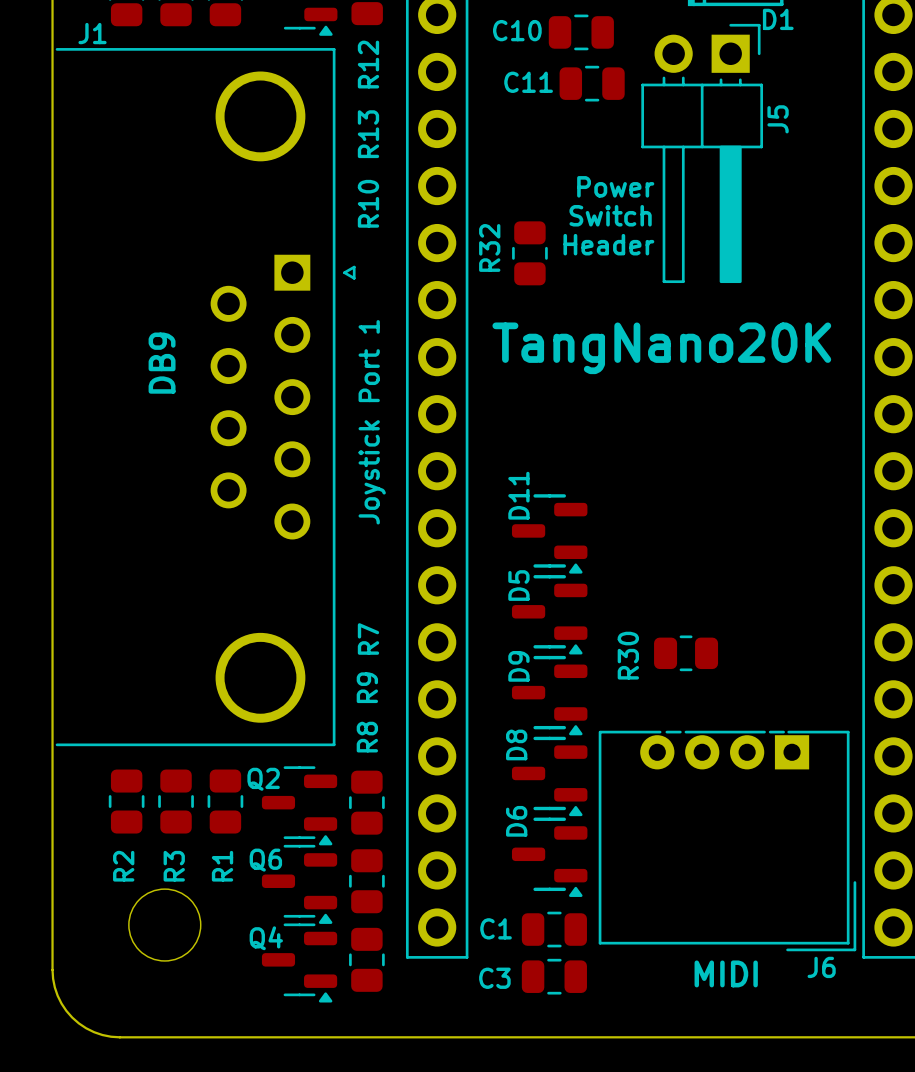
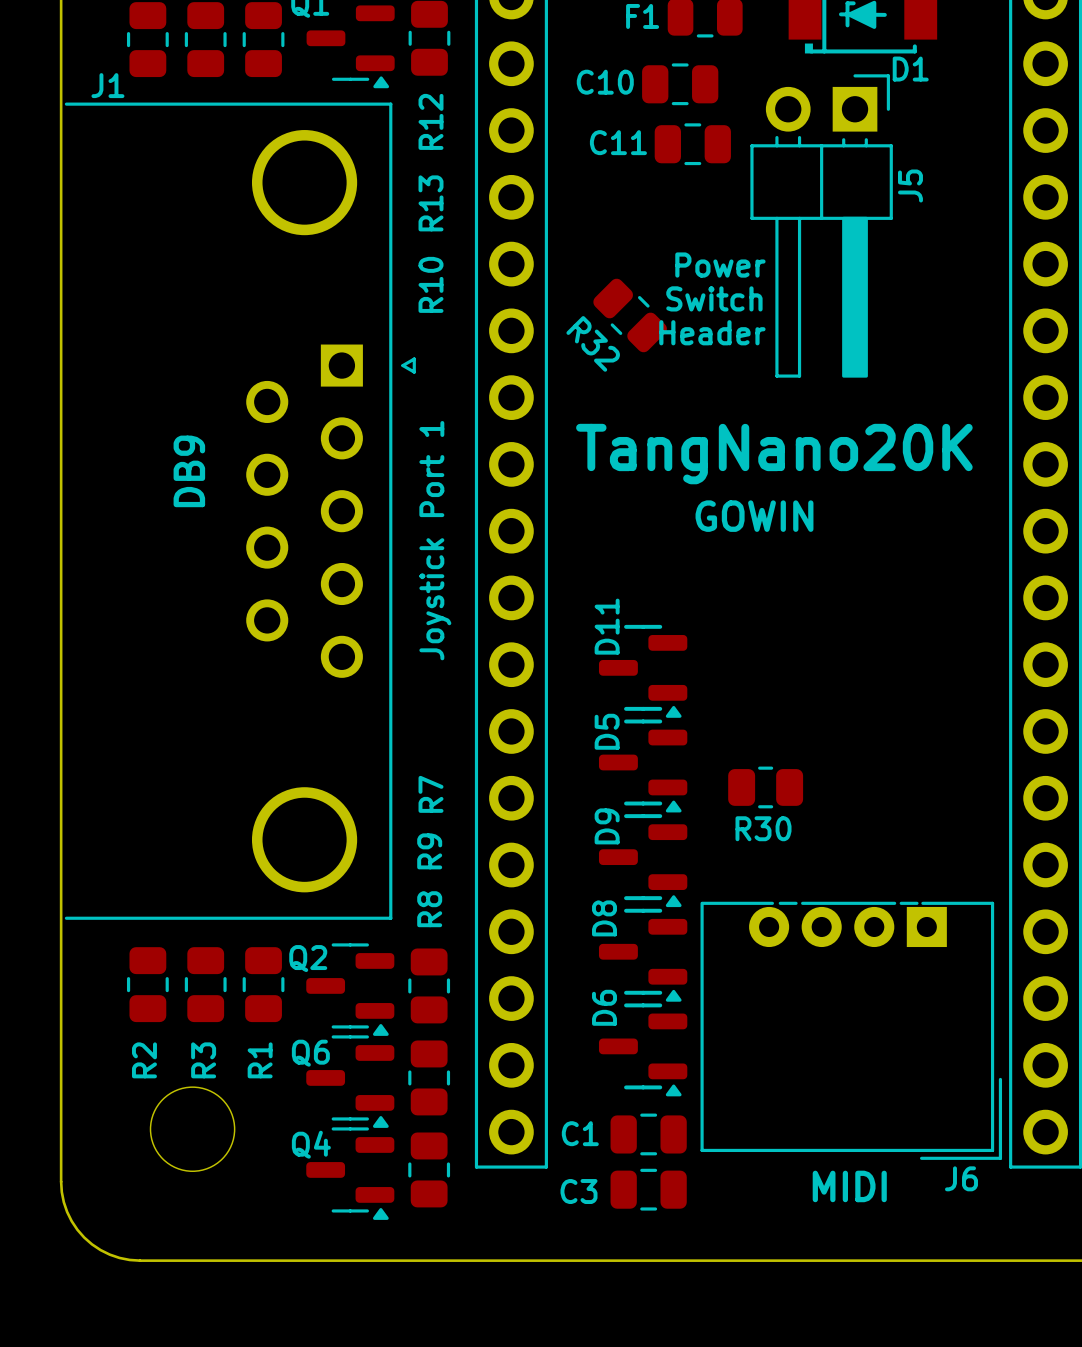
R32 rotation: 0° (529, 253) -> 45° counterclockwise (630, 315)
text: none -> GOWIN (754, 516)
R30 position: (686, 653) -> (765, 787)
R30 name rotation: 0° (628, 655) -> 90° clockwise (763, 828)

